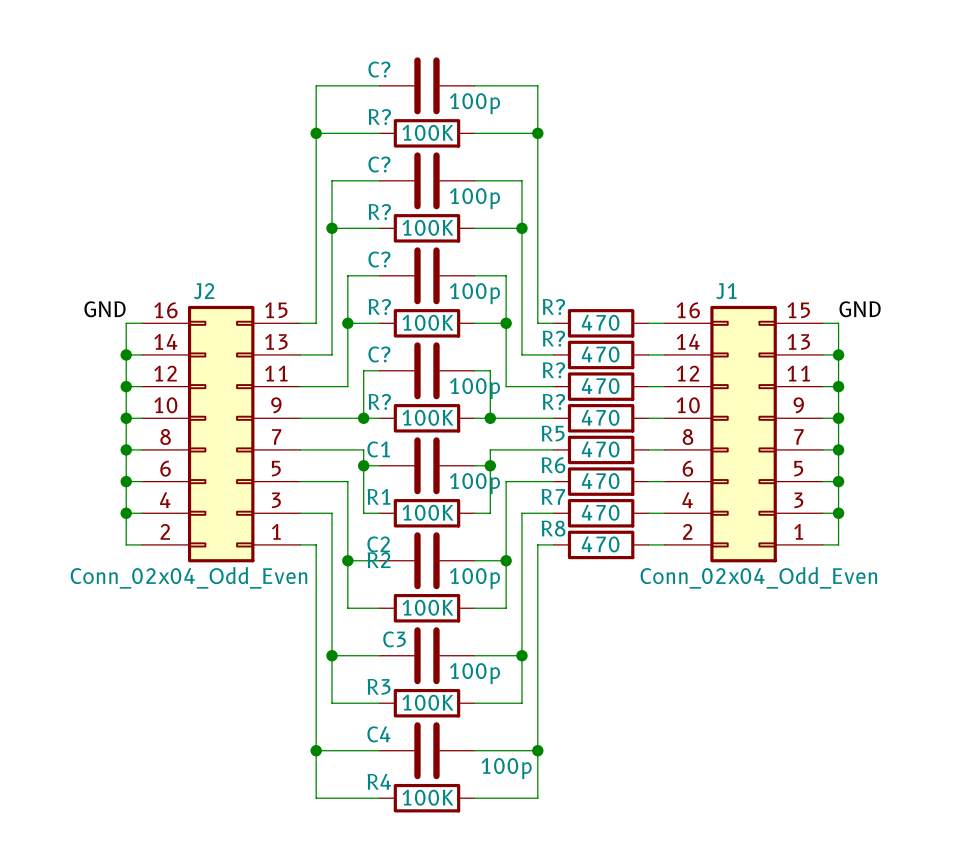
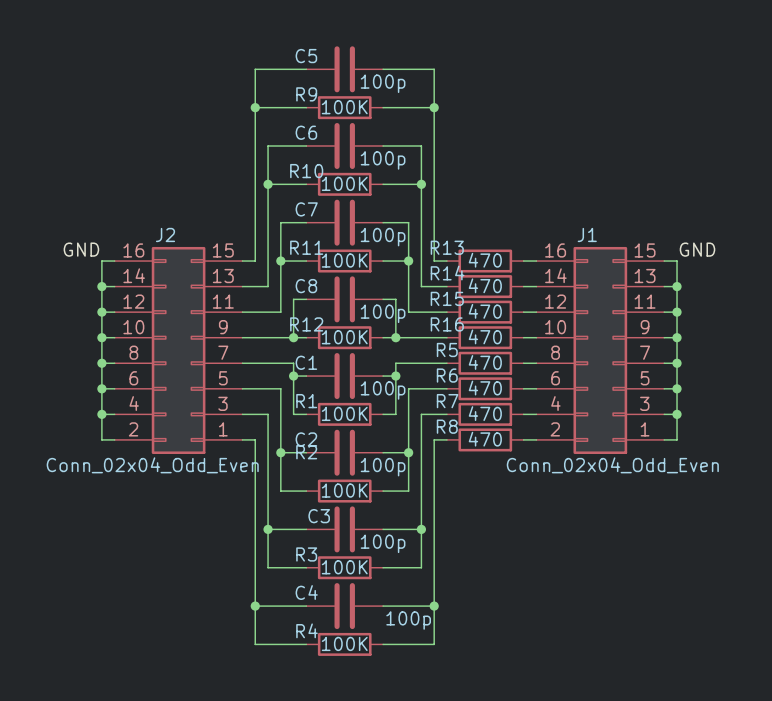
C? name: C? (379, 69) -> C5 (306, 56)
R? name: R? (379, 117) -> R9 (306, 94)
C? name: C? (379, 164) -> C6 (306, 132)
R? name: R? (379, 211) -> R10 (306, 171)
C? name: C? (379, 259) -> C7 (306, 209)
R? name: R? (379, 306) -> R11 (306, 247)
R? name: R? (553, 306) -> R13 (447, 247)
R? name: R? (553, 338) -> R14 (447, 273)
C? name: C? (379, 354) -> C8 (306, 286)
R? name: R? (553, 370) -> R15 (447, 298)
R? name: R? (379, 401) -> R12 (306, 324)
R? name: R? (553, 401) -> R16 (447, 324)

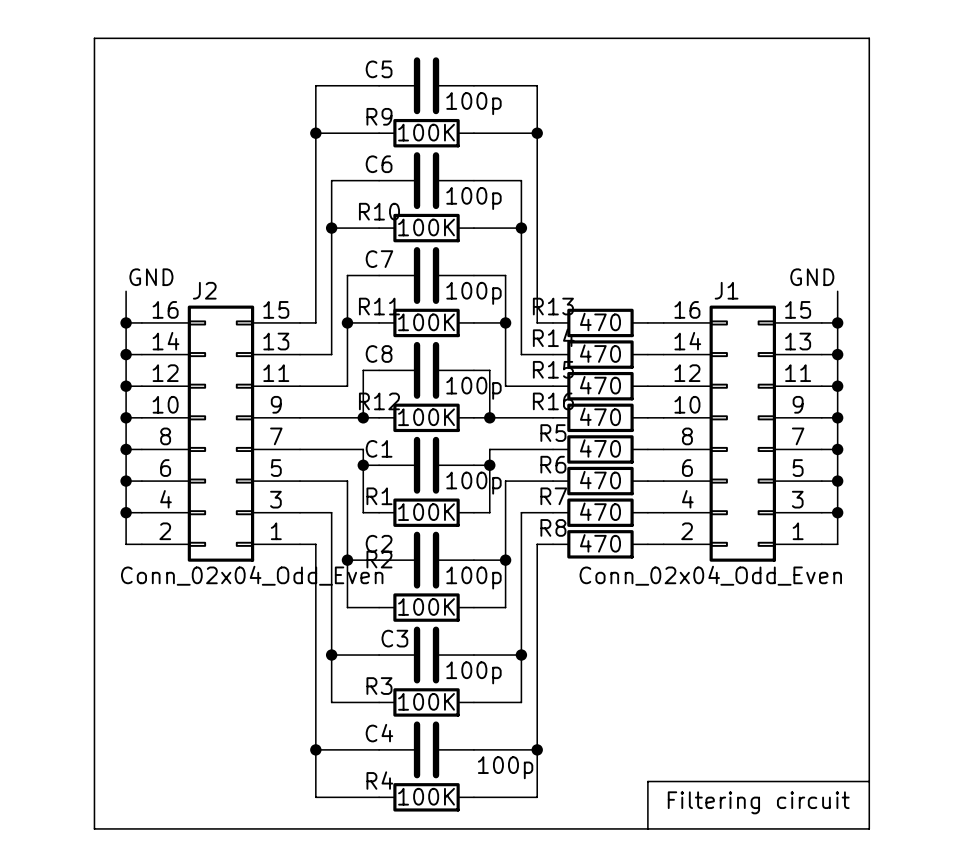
line: none -> (94, 38) (94, 828) (869, 828) (869, 38) (94, 38)
wire: none -> (126, 291) (126, 322)
wire: none -> (837, 291) (837, 322)
label position: GND (81, 249) -> GND (151, 277)
label position: GND (697, 249) -> GND (812, 277)
junction: none -> (126, 322)
junction: none -> (837, 322)
J2 value position: Conn_02x04_Odd_Even (152, 465) -> Conn_02x04_Odd_Even (252, 575)
J1 value position: Conn_02x04_Odd_Even (612, 465) -> Conn_02x04_Odd_Even (710, 575)
line: none -> (869, 781) (647, 781) (647, 828)
text: none -> Filtering circuit (758, 802)

